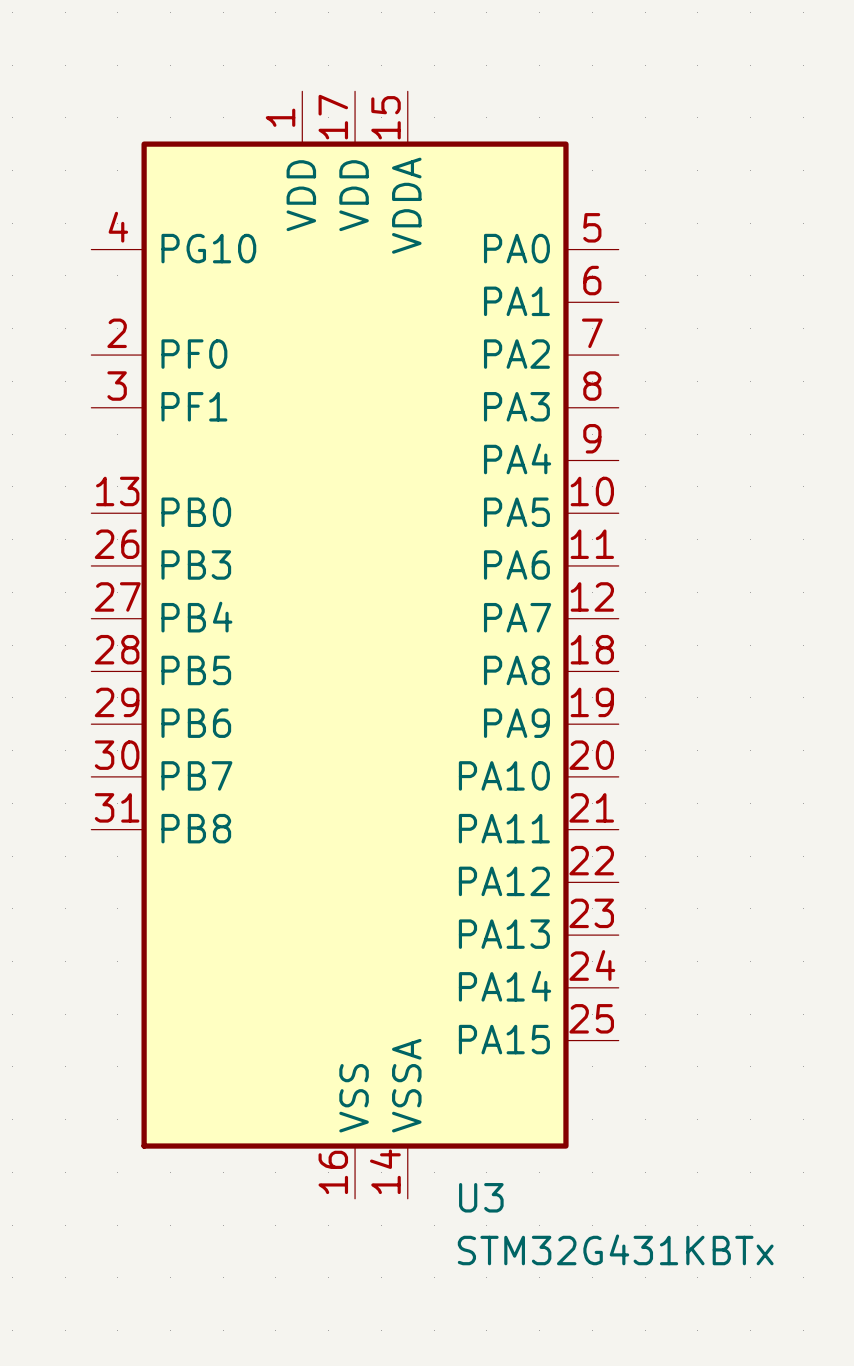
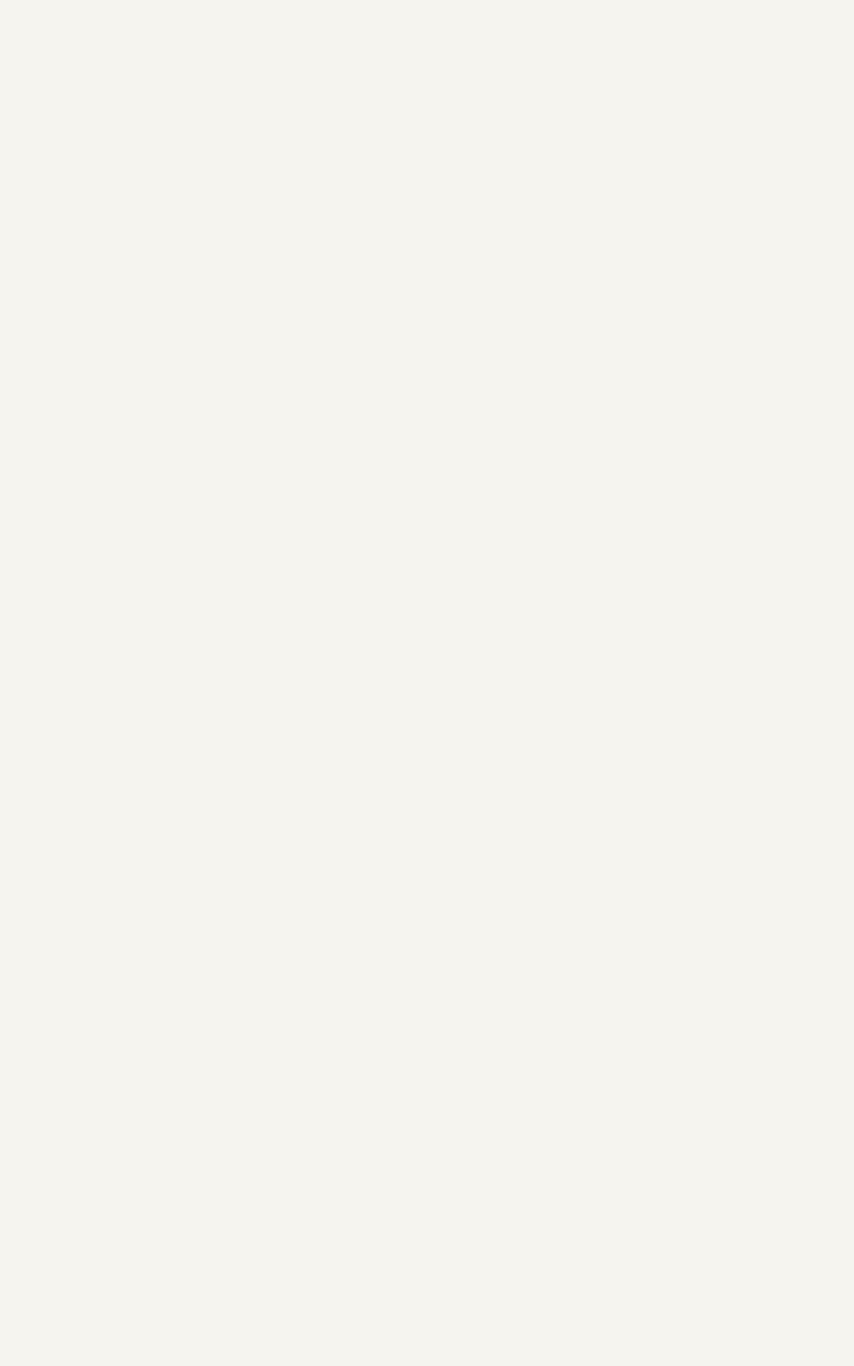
U3: STM32G431KBTx (355, 645) -> none

